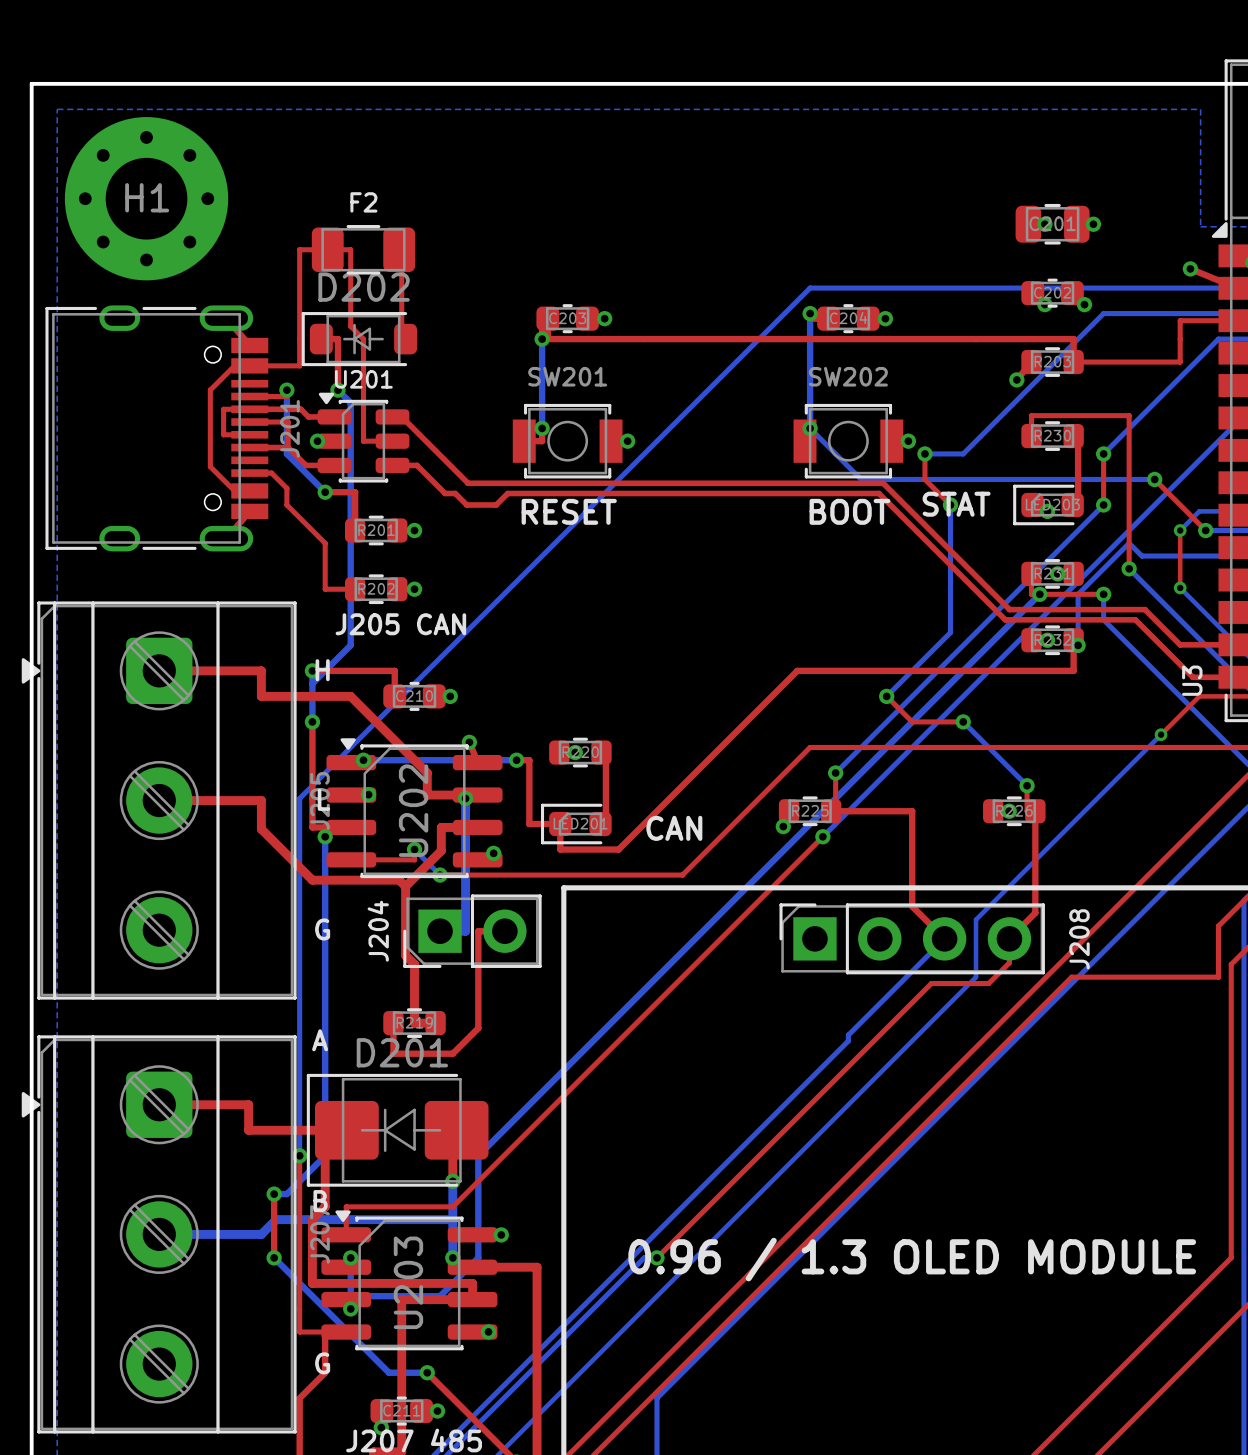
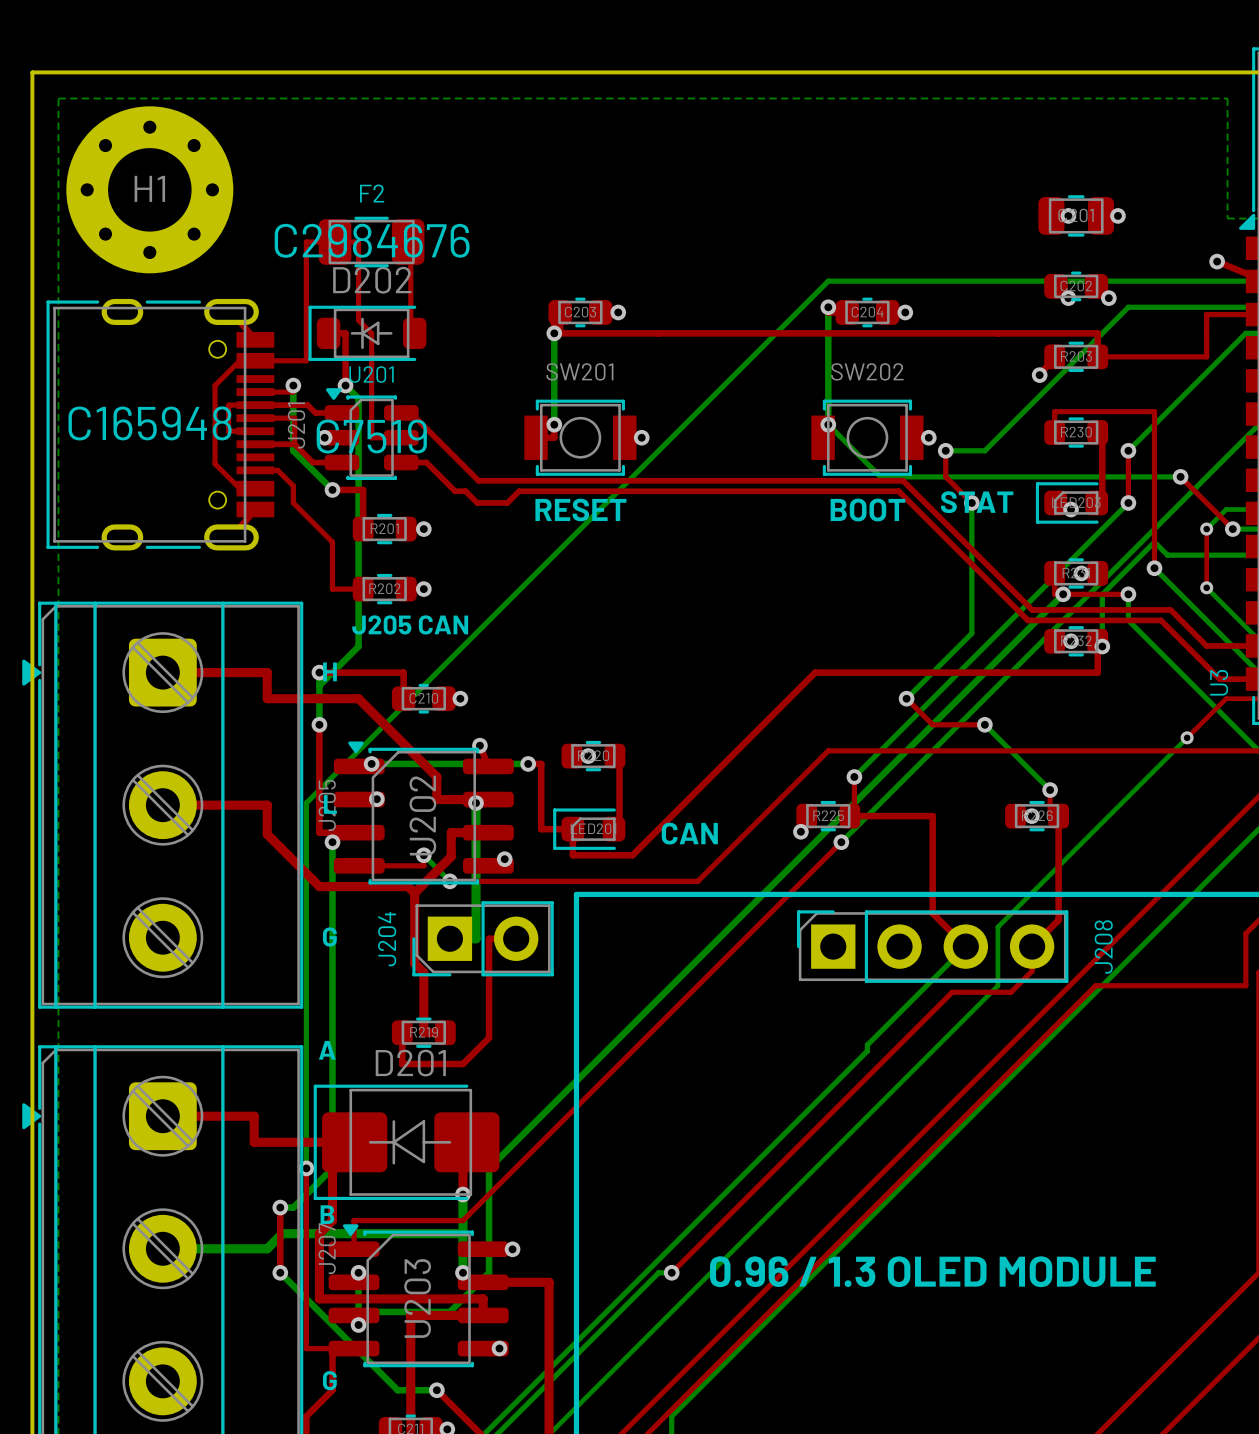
F2 text: none -> C2984676 (372, 240)
J201 text: none -> C165948 (150, 423)
U201 text: none -> C7519 (371, 436)

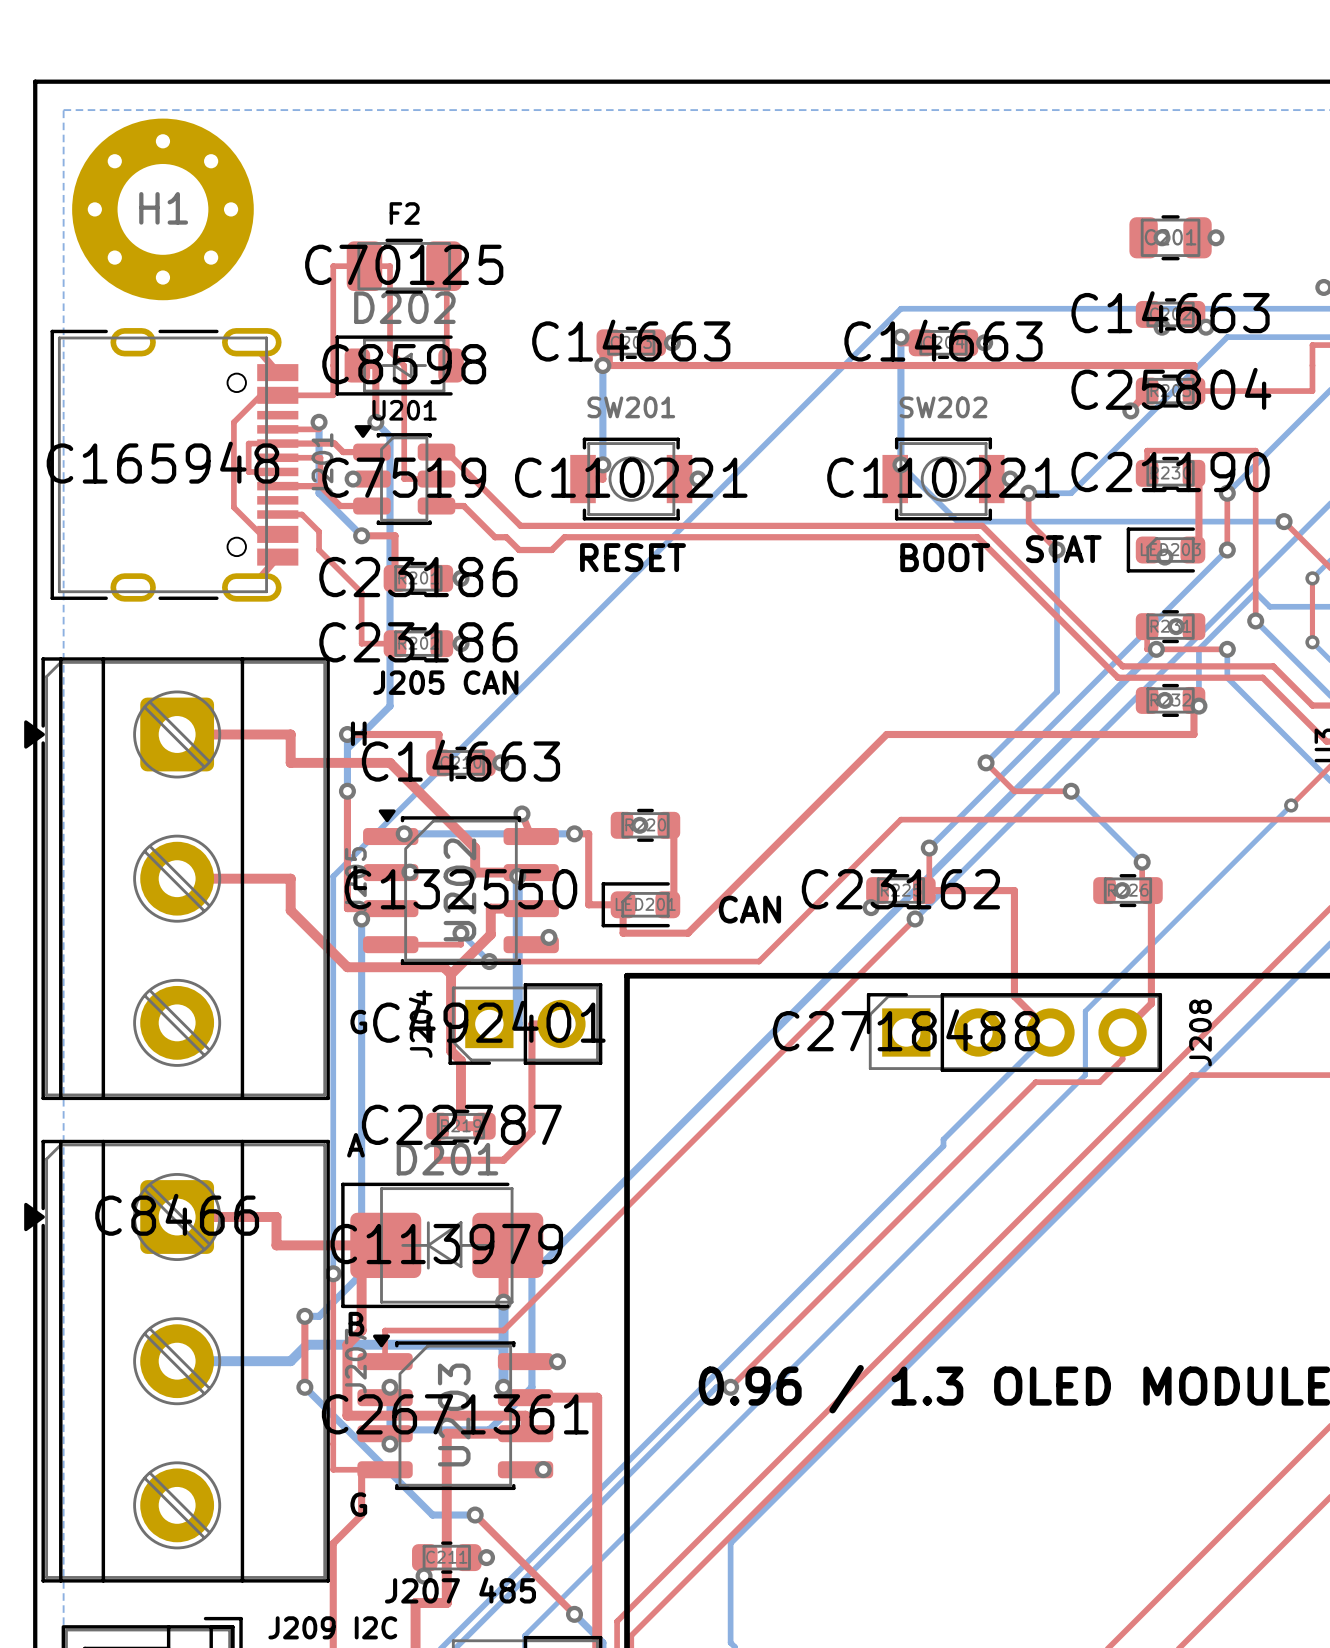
F2 text: C2984676 (372, 240) -> C70125 (404, 264)
C202 text: none -> C14663 (1170, 312)
C203 text: none -> C14663 (631, 340)
C204 text: none -> C14663 (943, 340)
D202 text: none -> C8598 (404, 364)
R203 text: none -> C25804 (1171, 388)
R230 text: none -> C21190 (1170, 472)
SW201 text: none -> C110221 (631, 477)
SW202 text: none -> C110221 (943, 477)
R201 text: none -> C23186 (418, 577)
R202 text: none -> C23186 (418, 642)
C210 text: none -> C14663 (460, 760)
U202 text: none -> C132550 (460, 889)
R225 text: none -> C23162 (900, 889)
J204 text: none -> C492401 (489, 1021)
J208 text: none -> C2718488 (906, 1030)
R219 text: none -> C22787 (461, 1124)
J207 text: none -> C8466 (177, 1214)
D201 text: none -> C113979 (446, 1244)
U203 text: none -> C2671361 (455, 1414)

